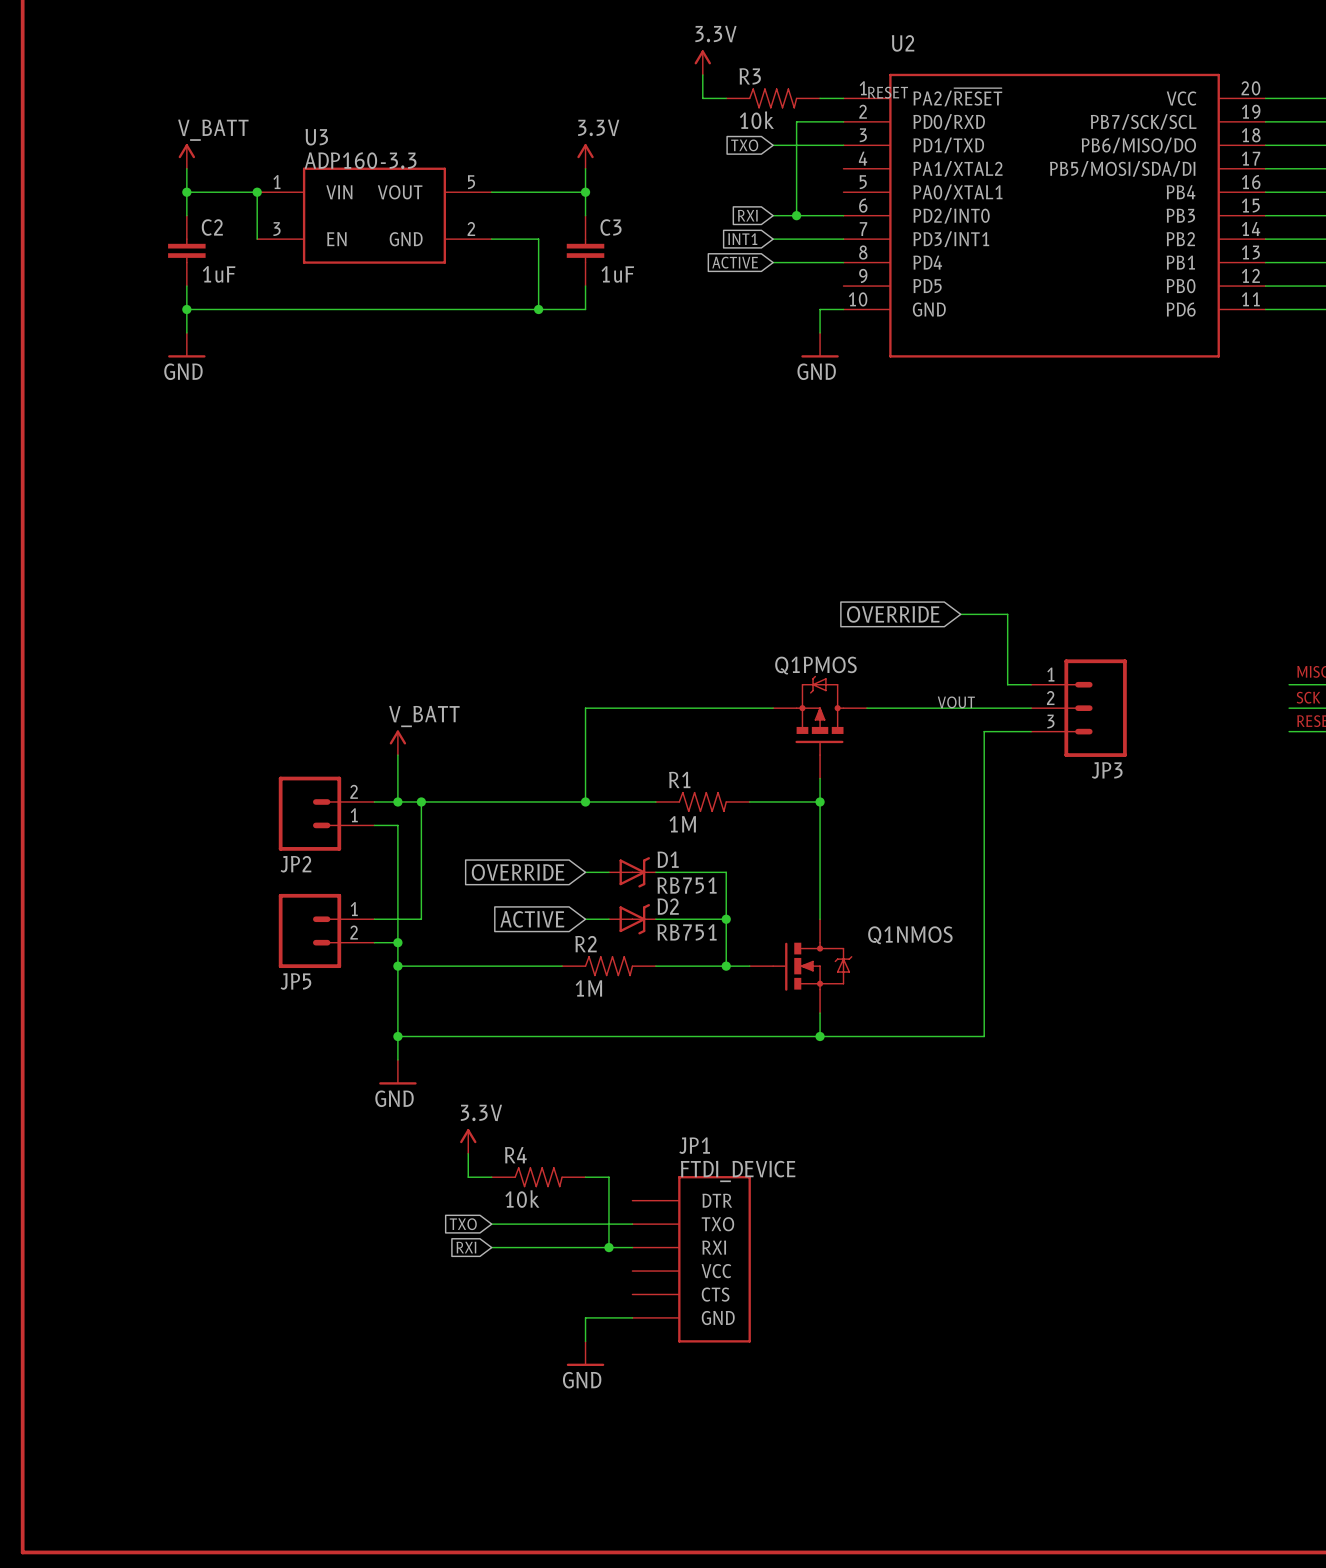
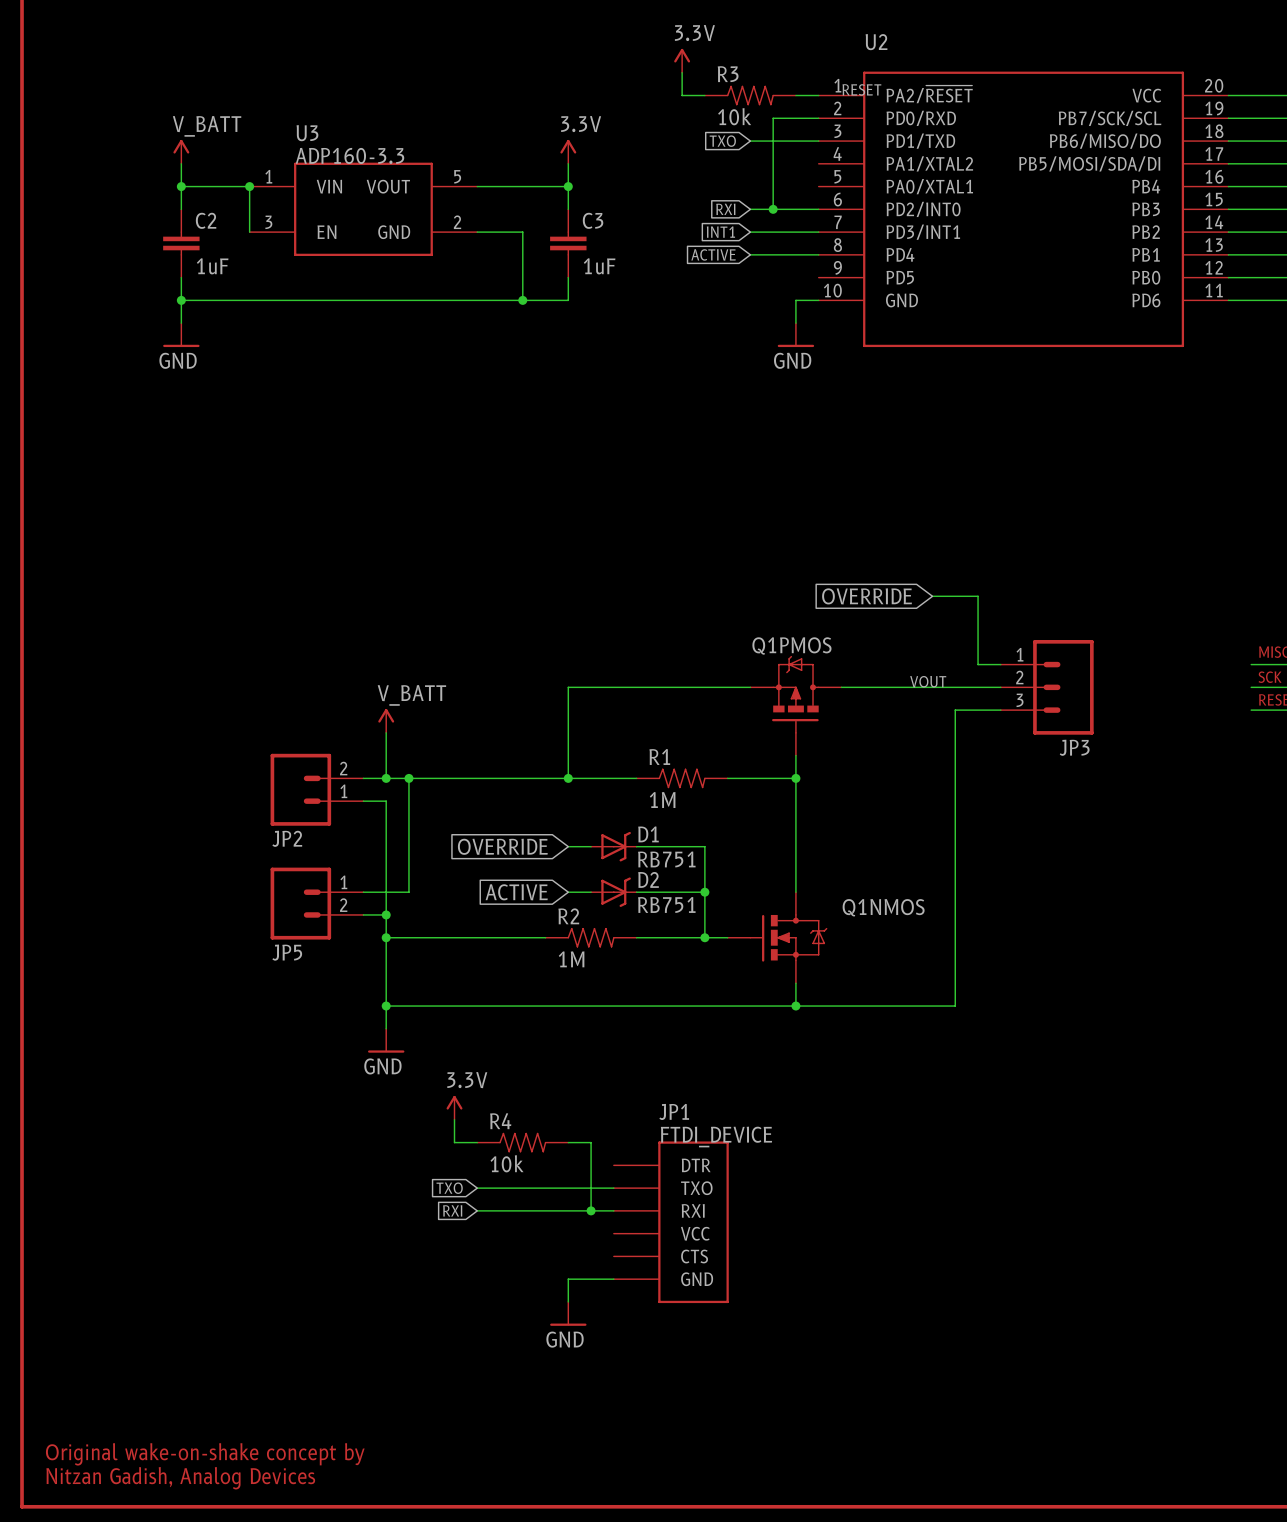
text: none -> Original wake-on-shake concept by (205, 1454)
text: none -> Nitzan Gadish, Analog Devices (180, 1478)

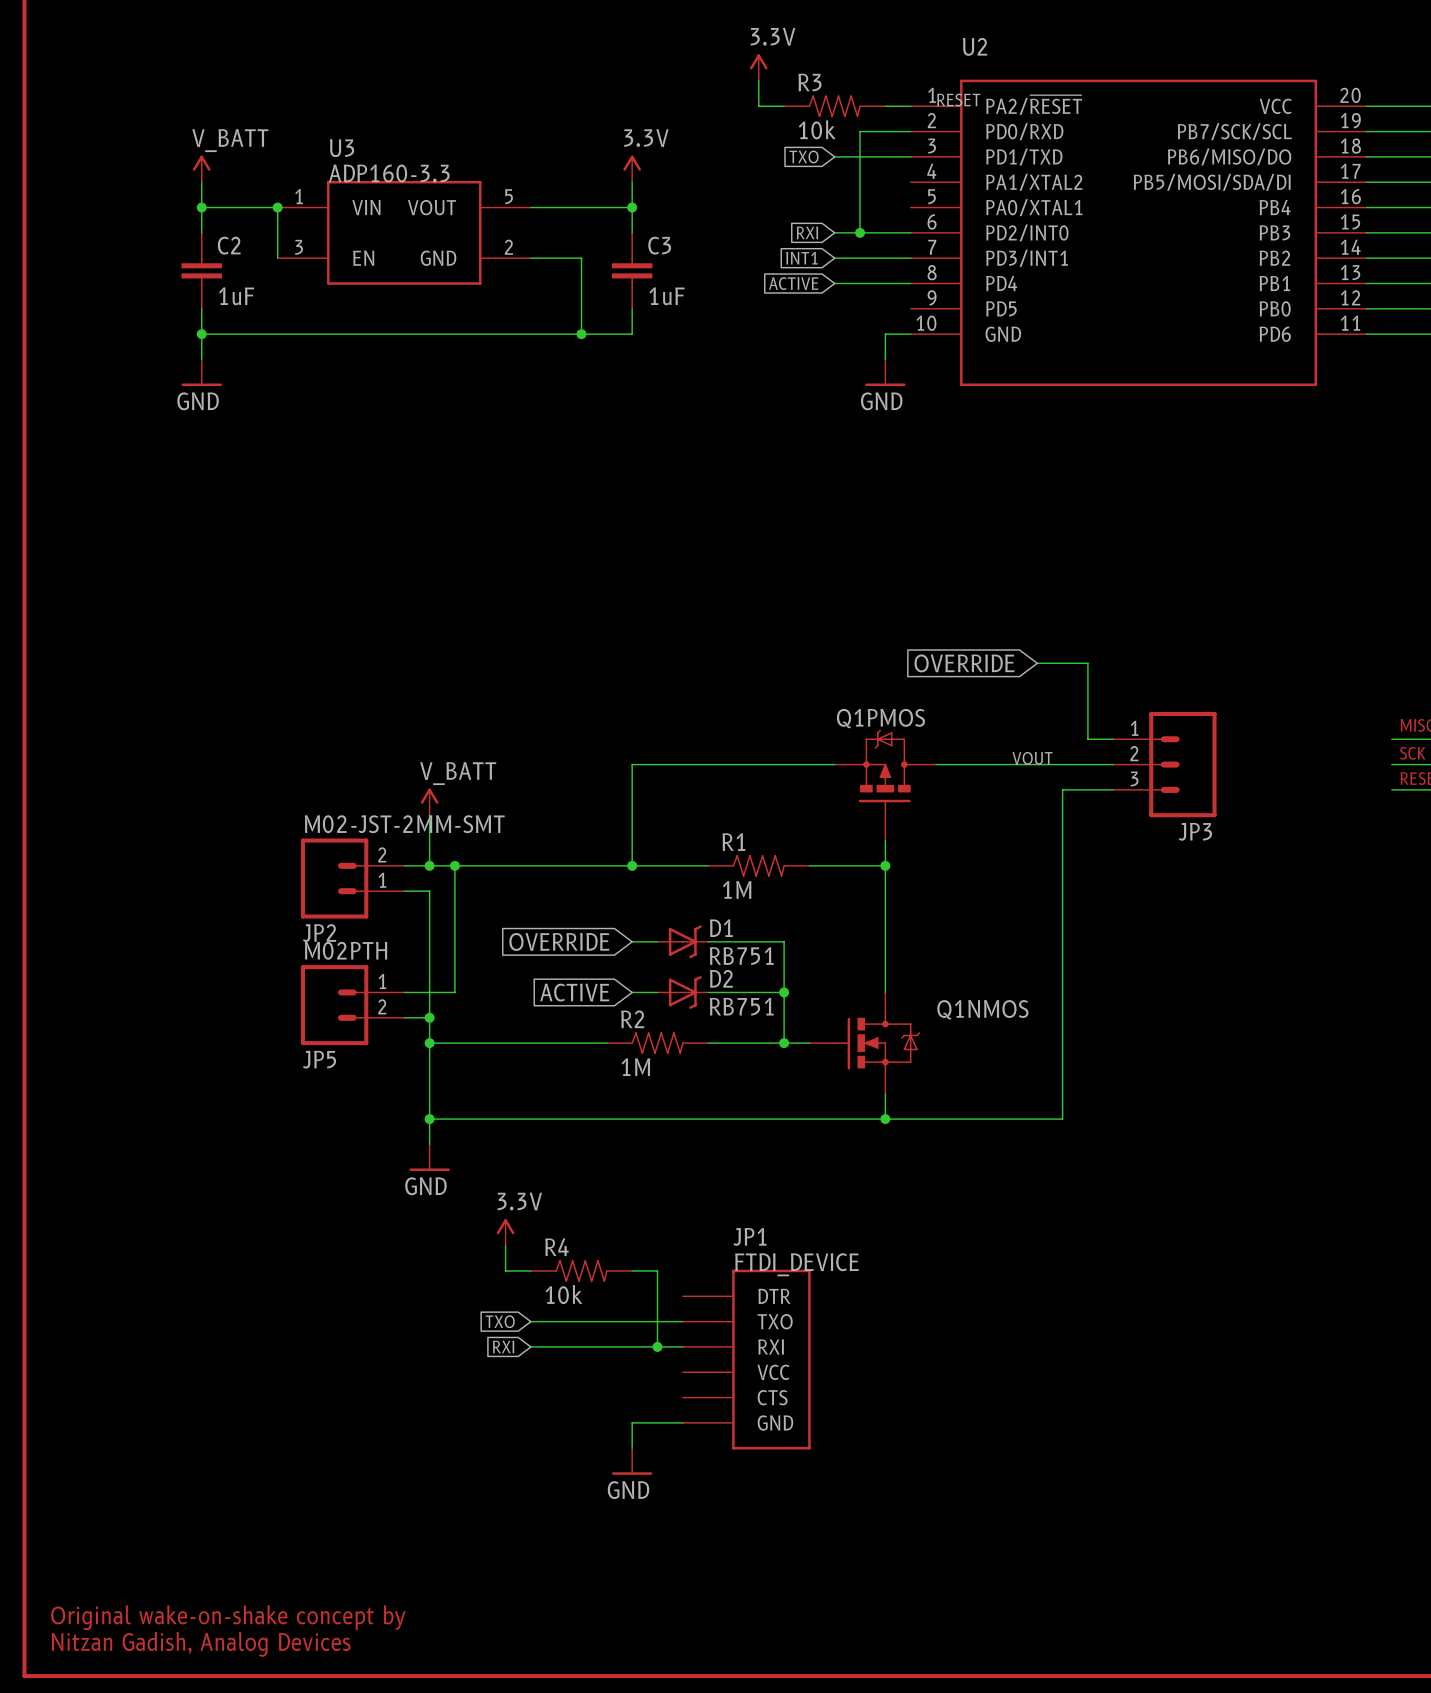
JP2 value: none -> M02-JST-2MM-SMT (404, 824)
JP5 value: none -> M02PTH (345, 950)

